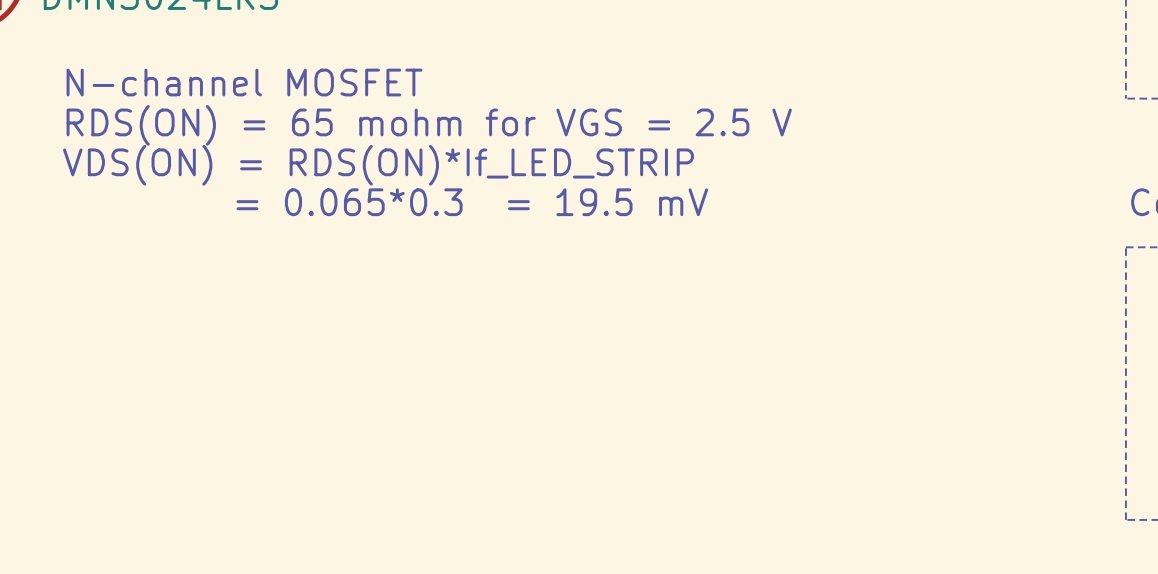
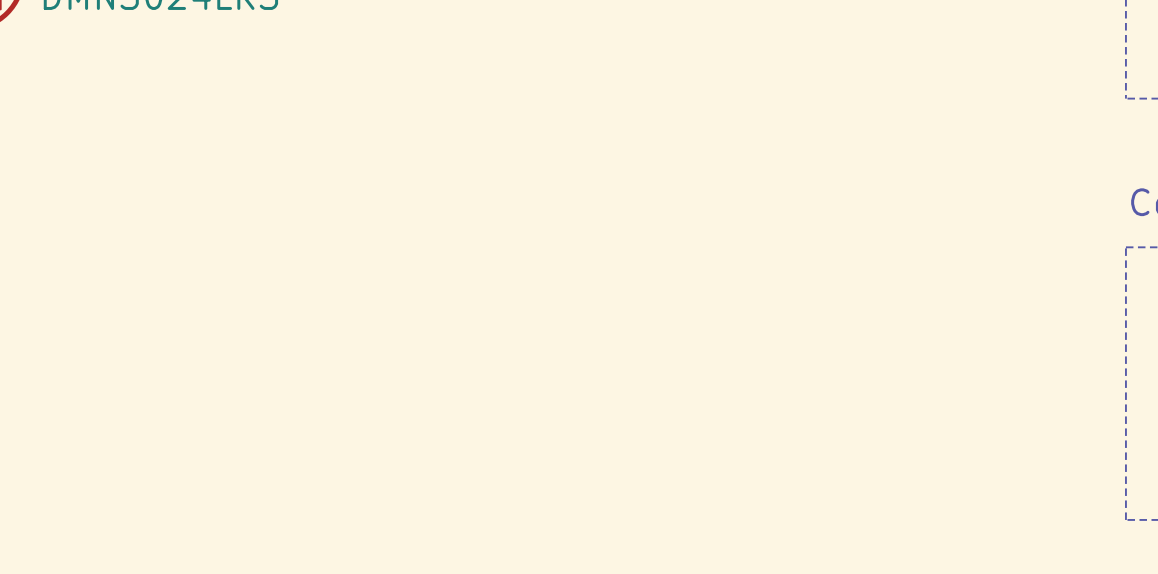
text: N-channel MOSFET (244, 82) -> none
text: RDS(ON) = 65 mohm for VGS = 2.5 V (429, 125) -> none
text: VDS(ON) = RDS(ON)*If_LED_STRIP (378, 165) -> none
text: = 0.065*0.3 = 19.5 mV (472, 202) -> none

